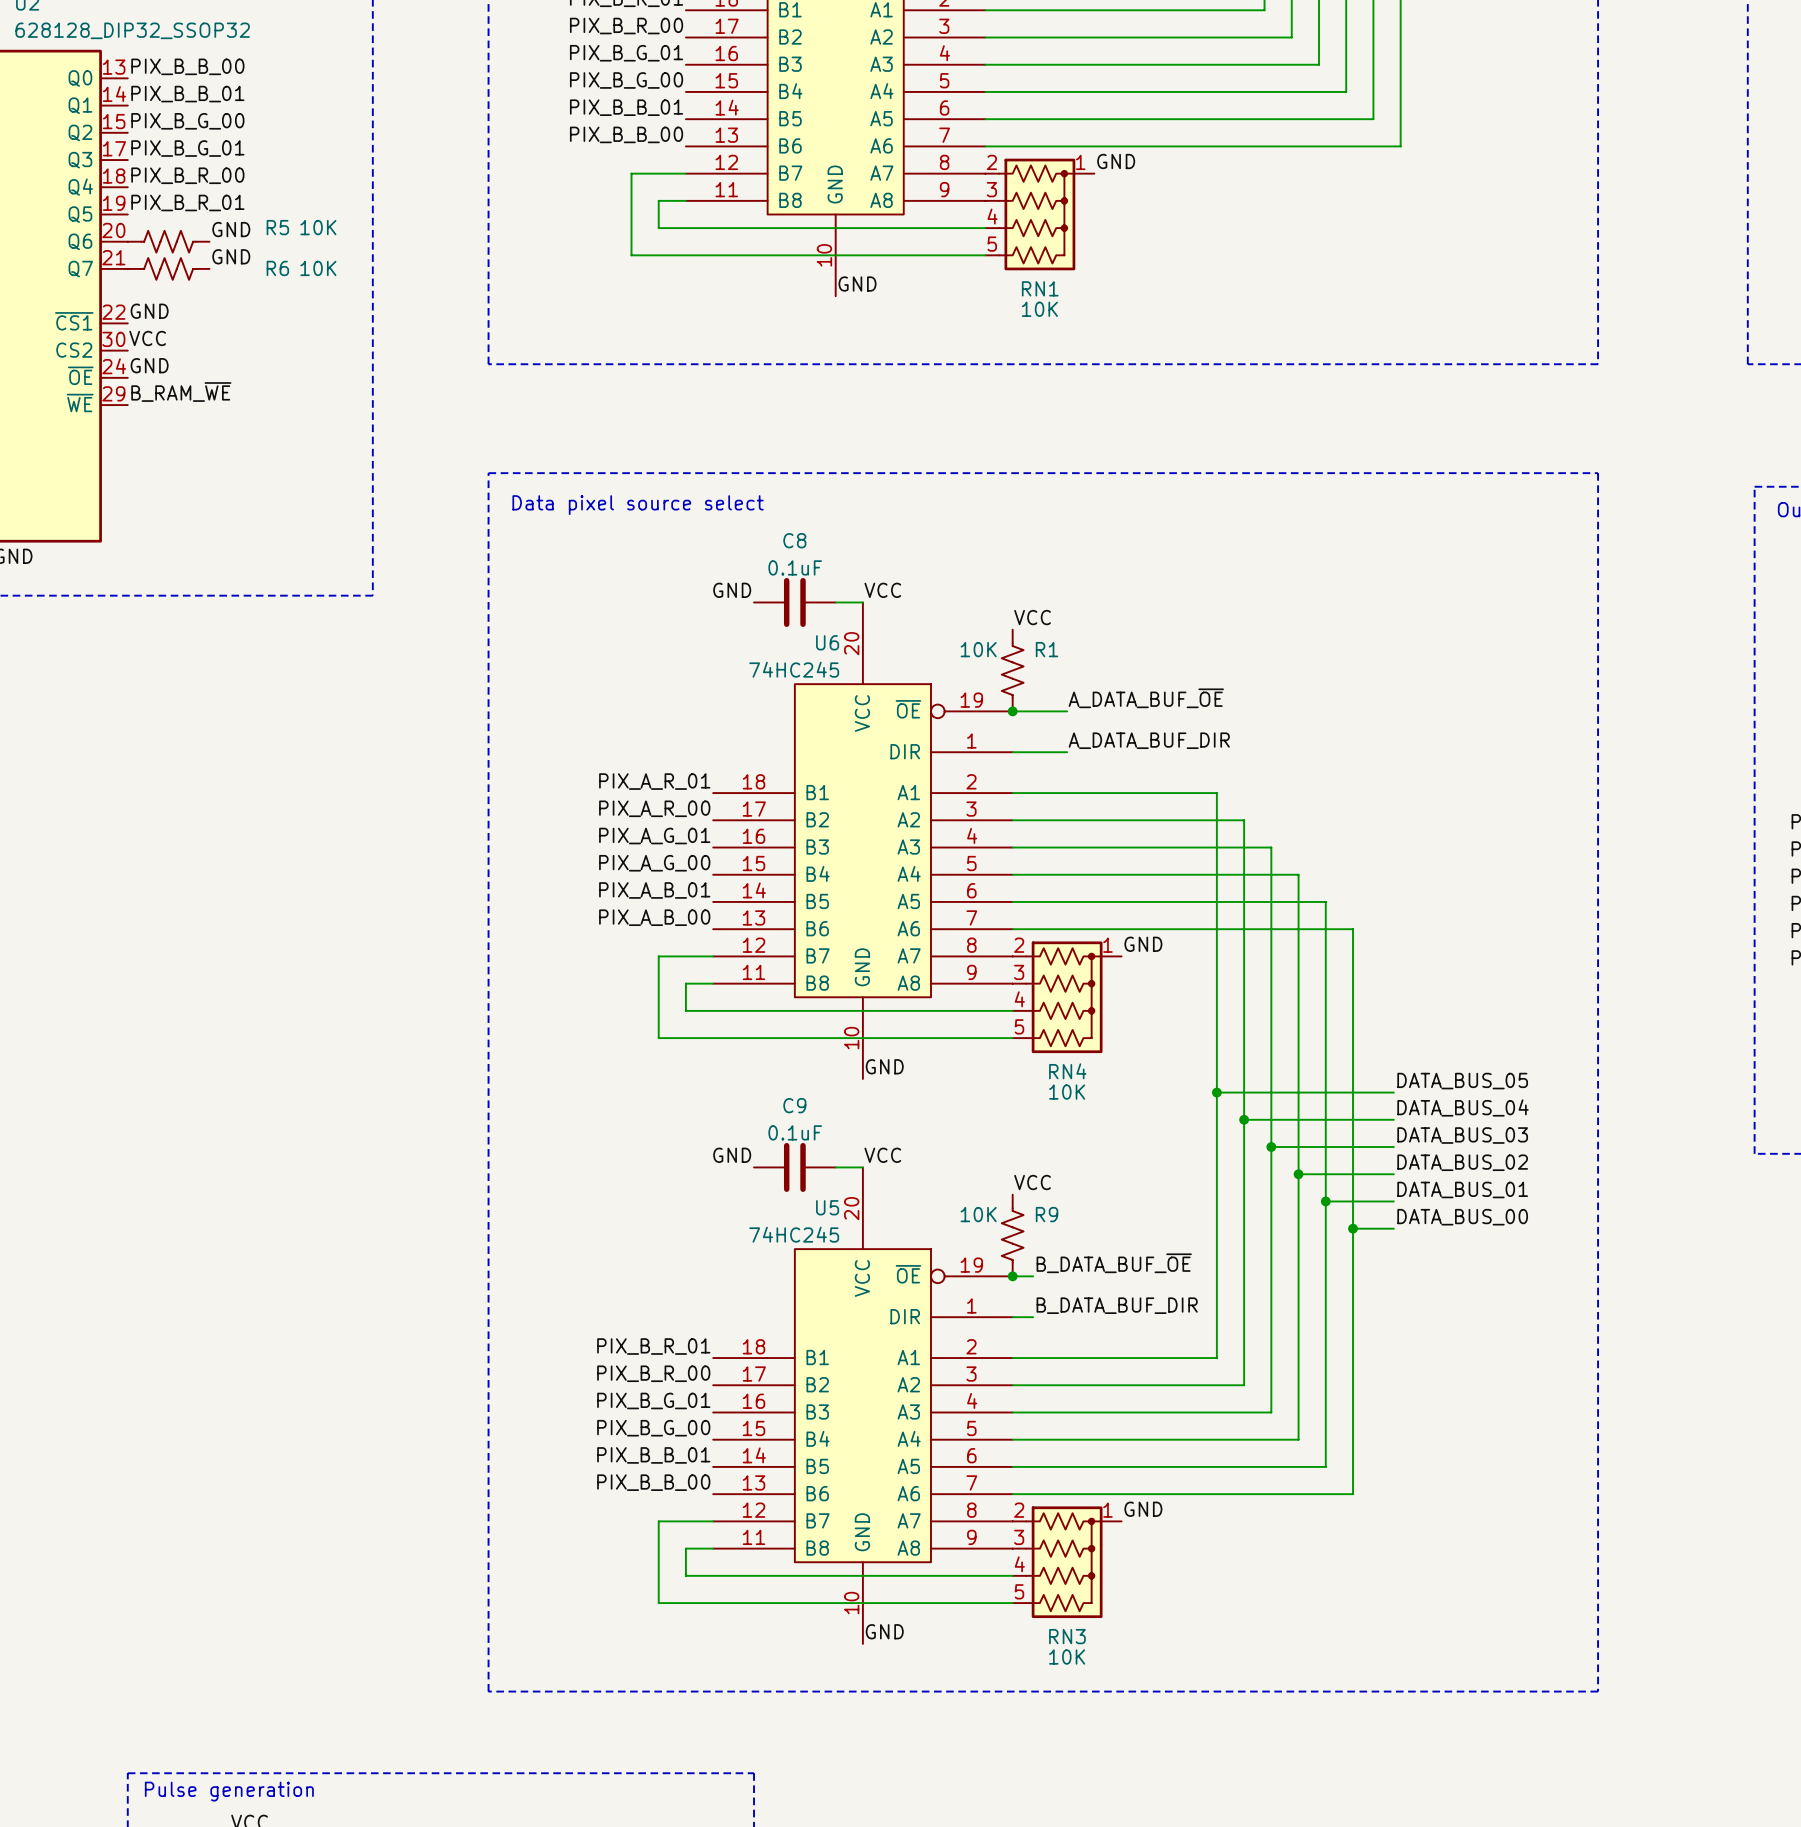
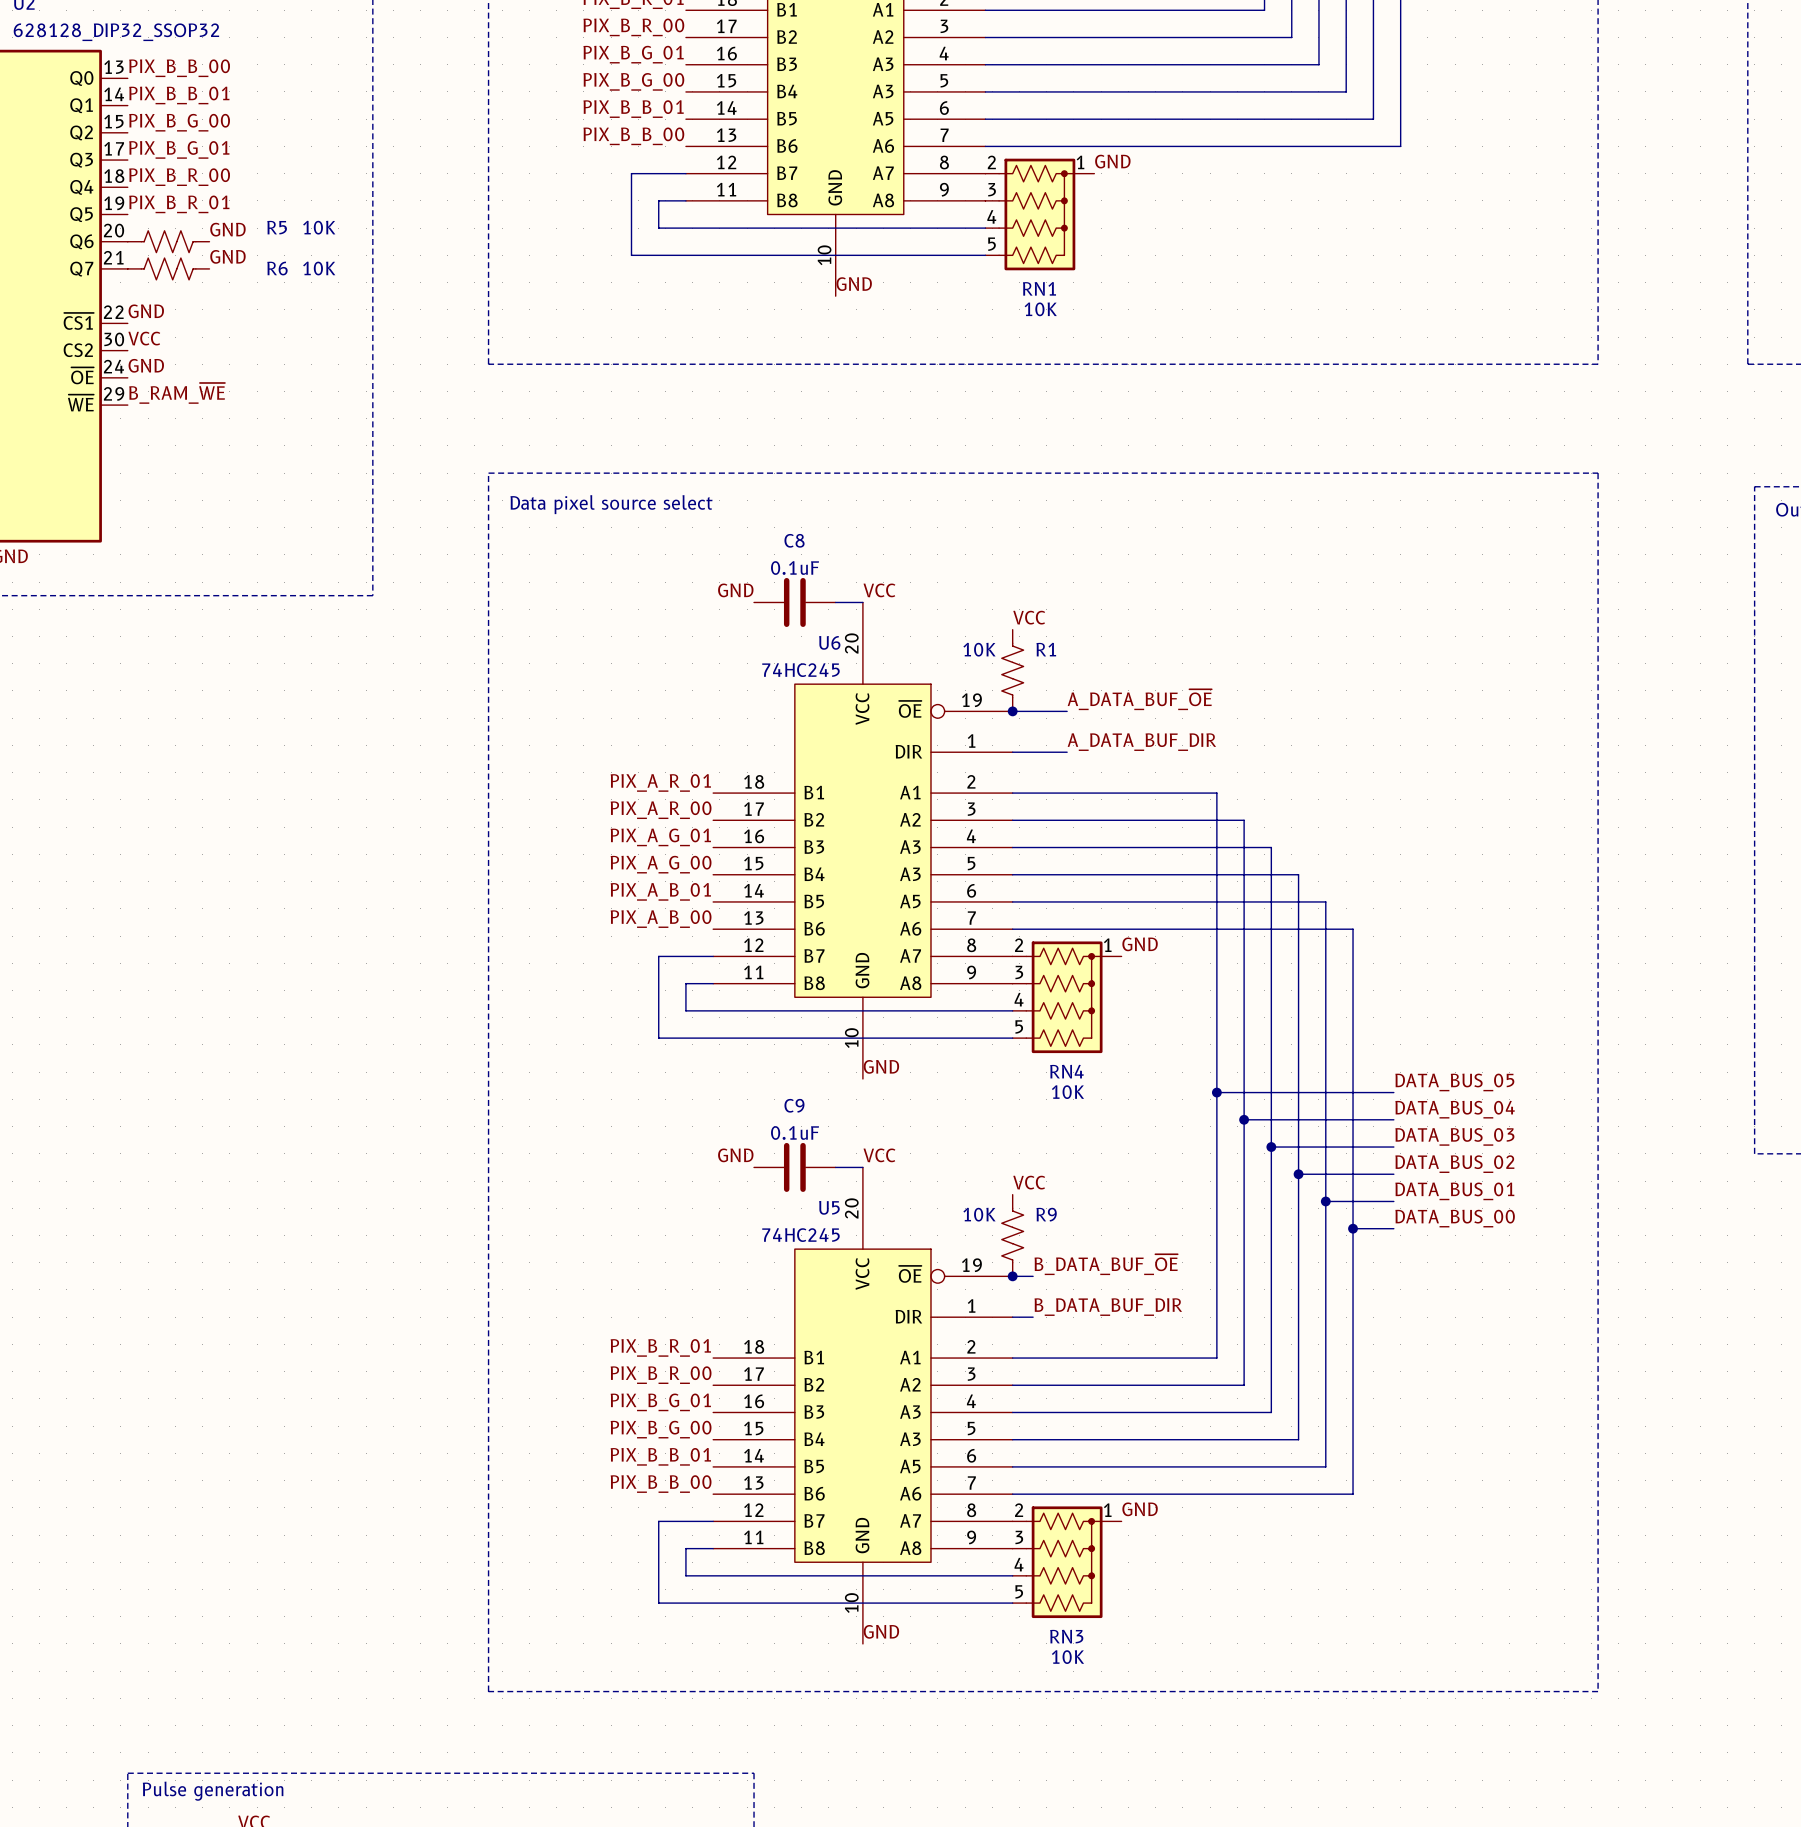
part pin name: A4 (881, 91) -> A3 (883, 91)
U6 pin name: A4 (909, 873) -> A3 (910, 874)
U5 pin name: A4 (909, 1438) -> A3 (910, 1439)

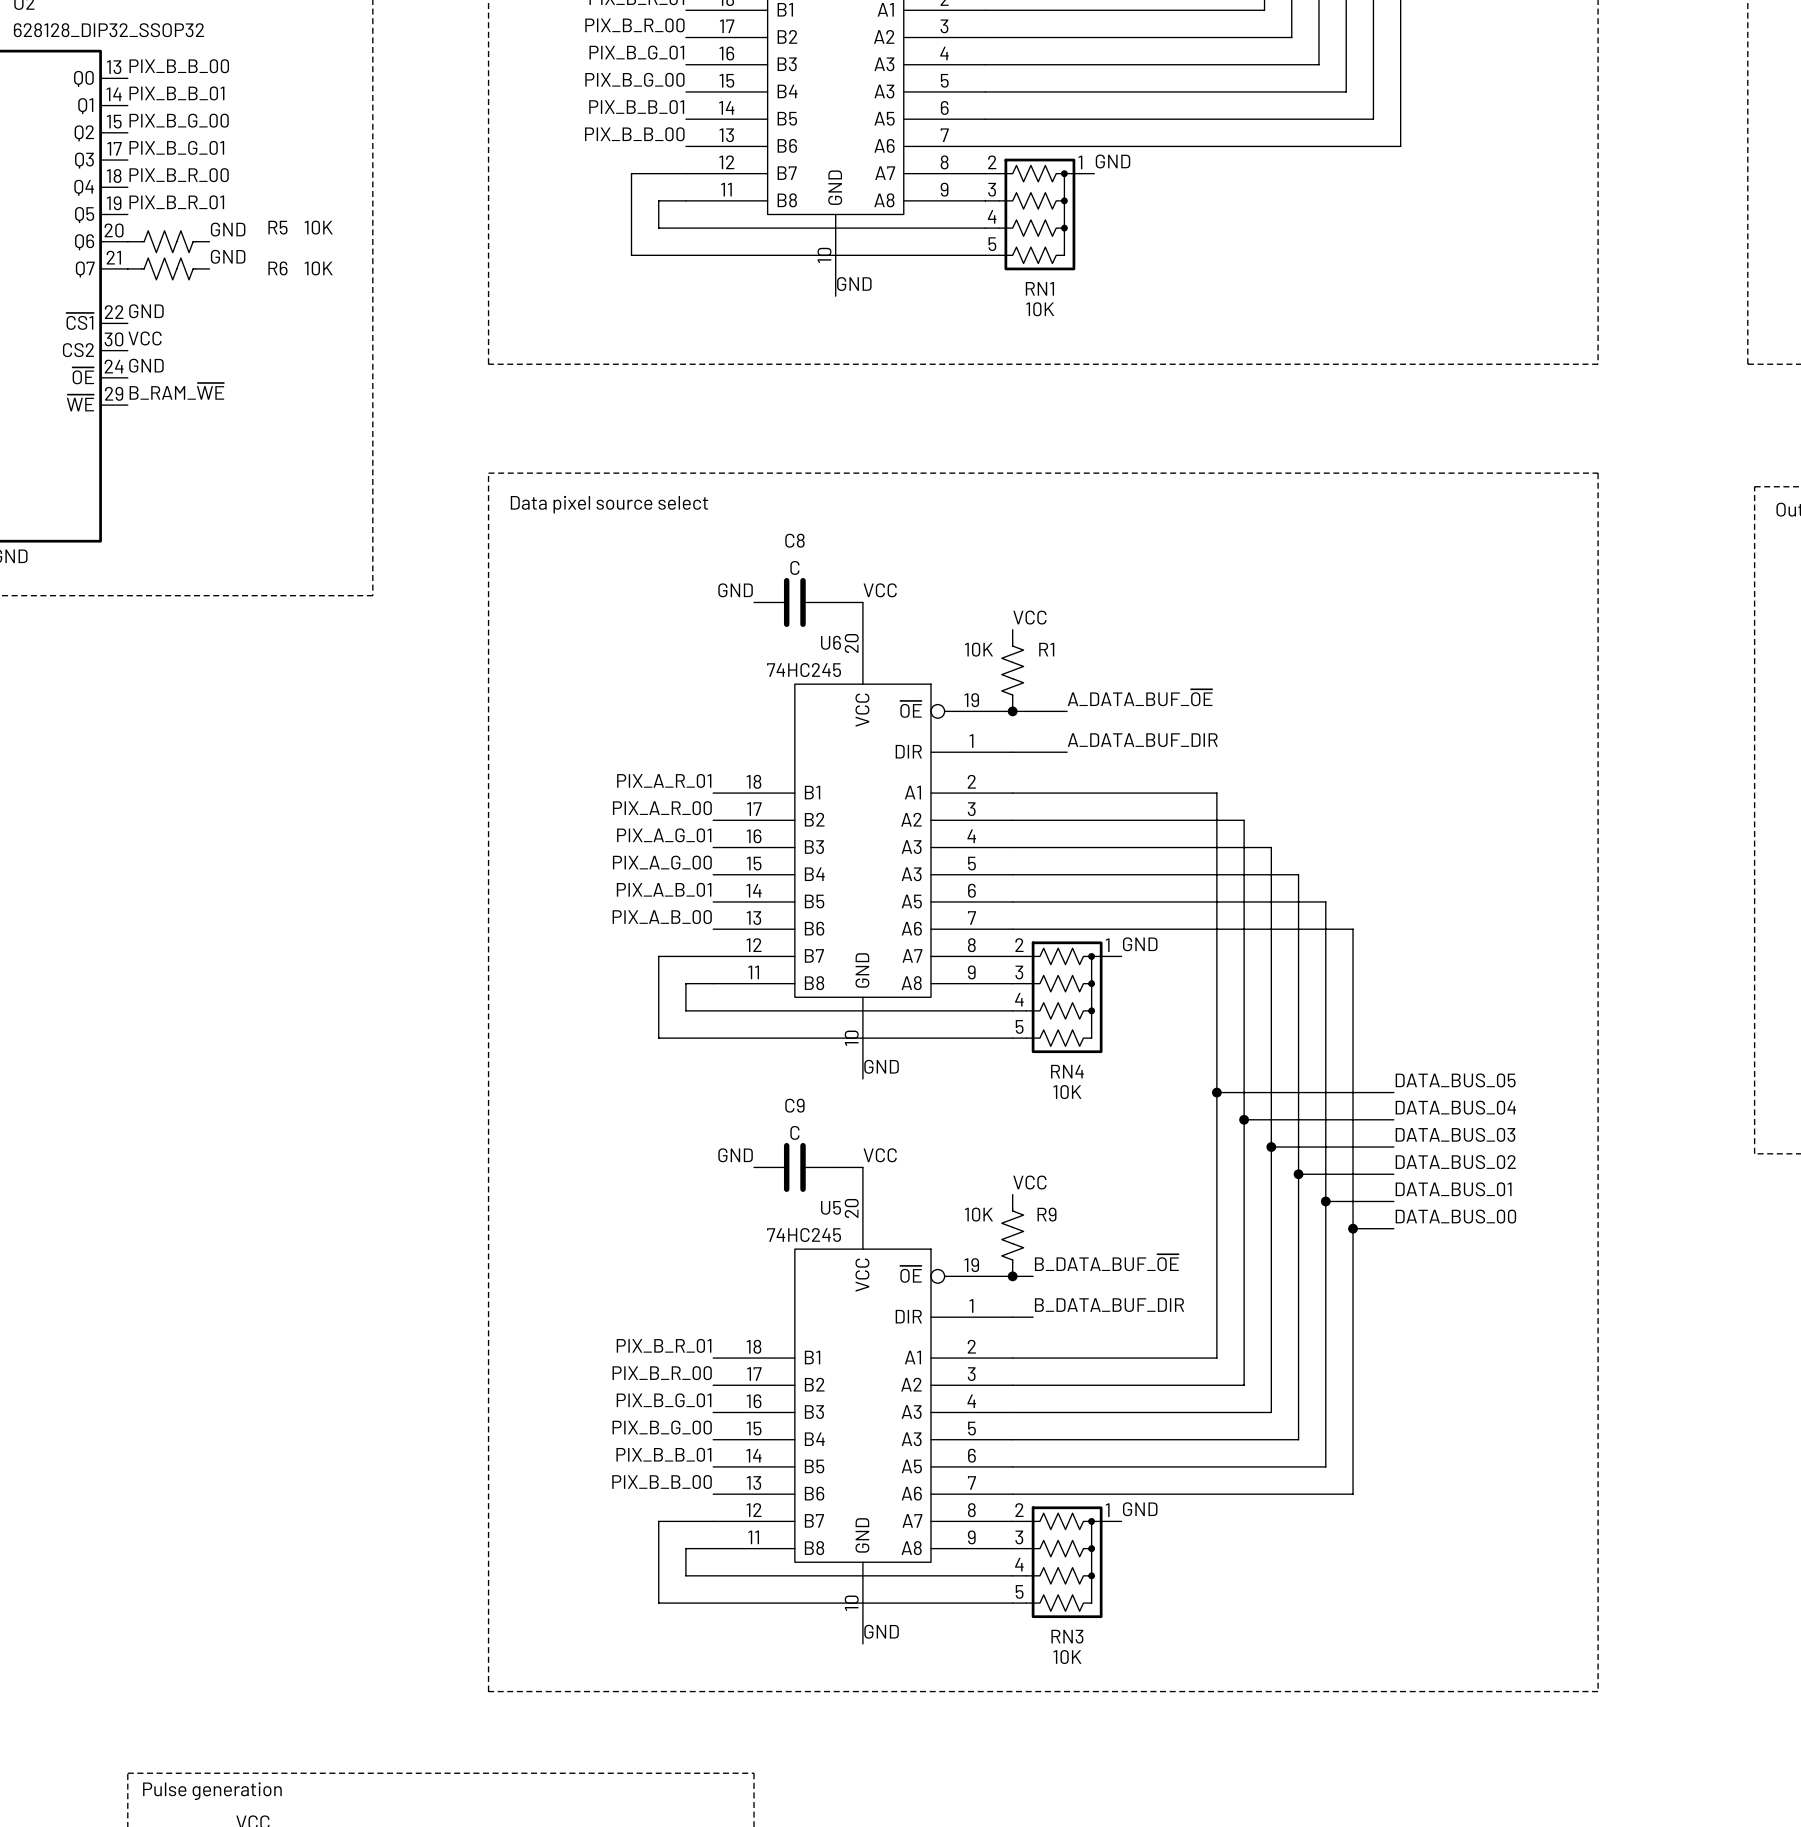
C8 value: 0.1uF (795, 568) -> C (794, 567)
C9 value: 0.1uF (795, 1132) -> C (794, 1132)

